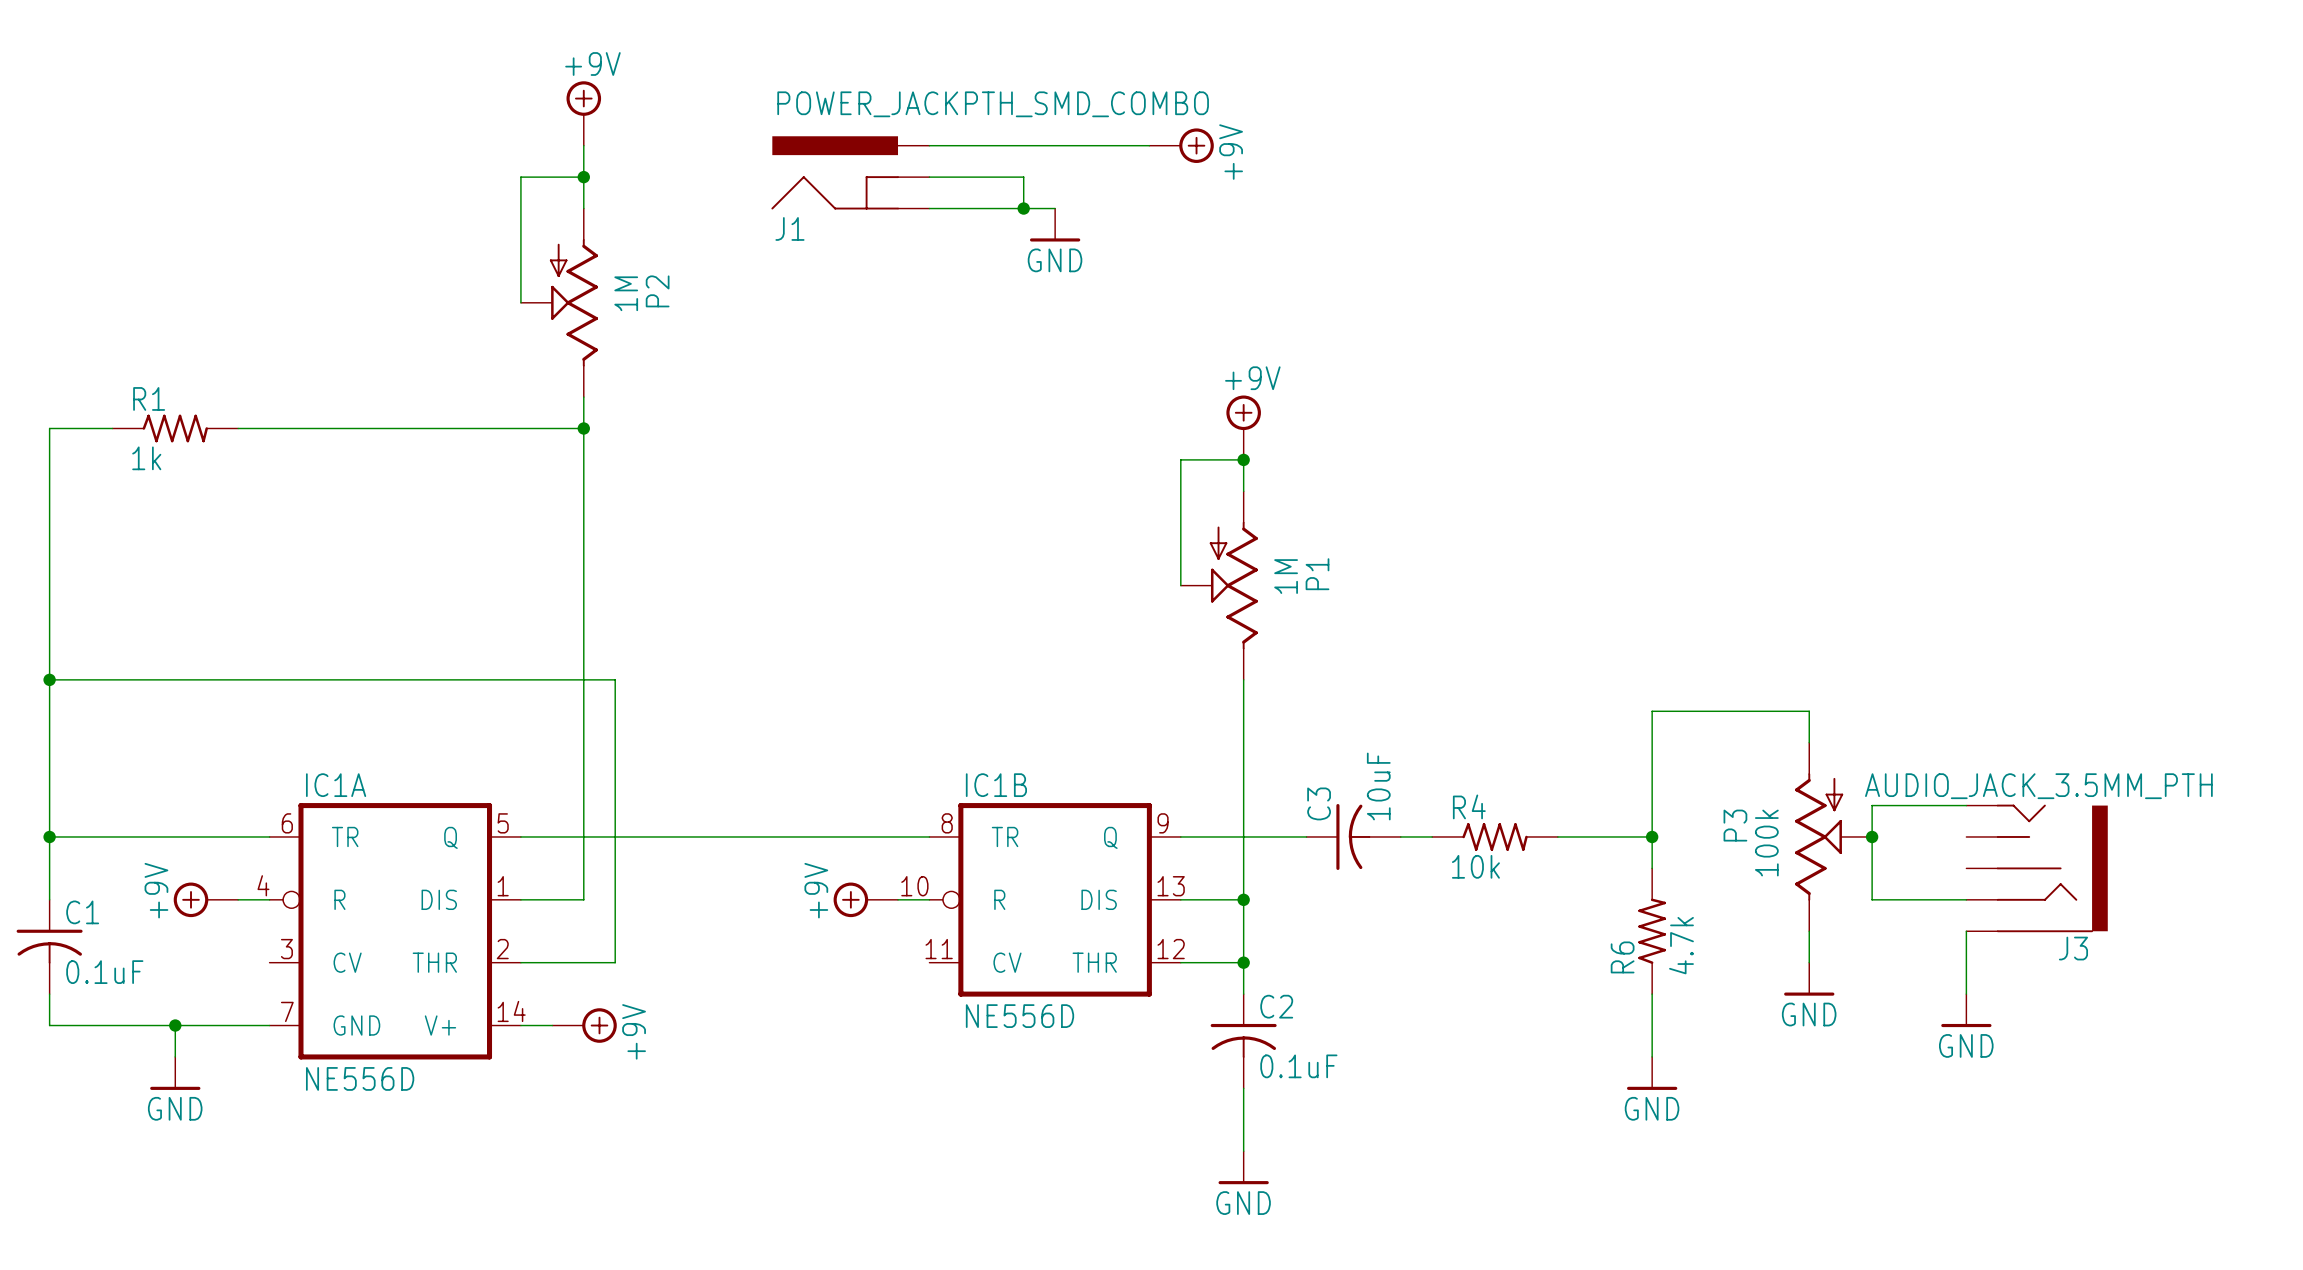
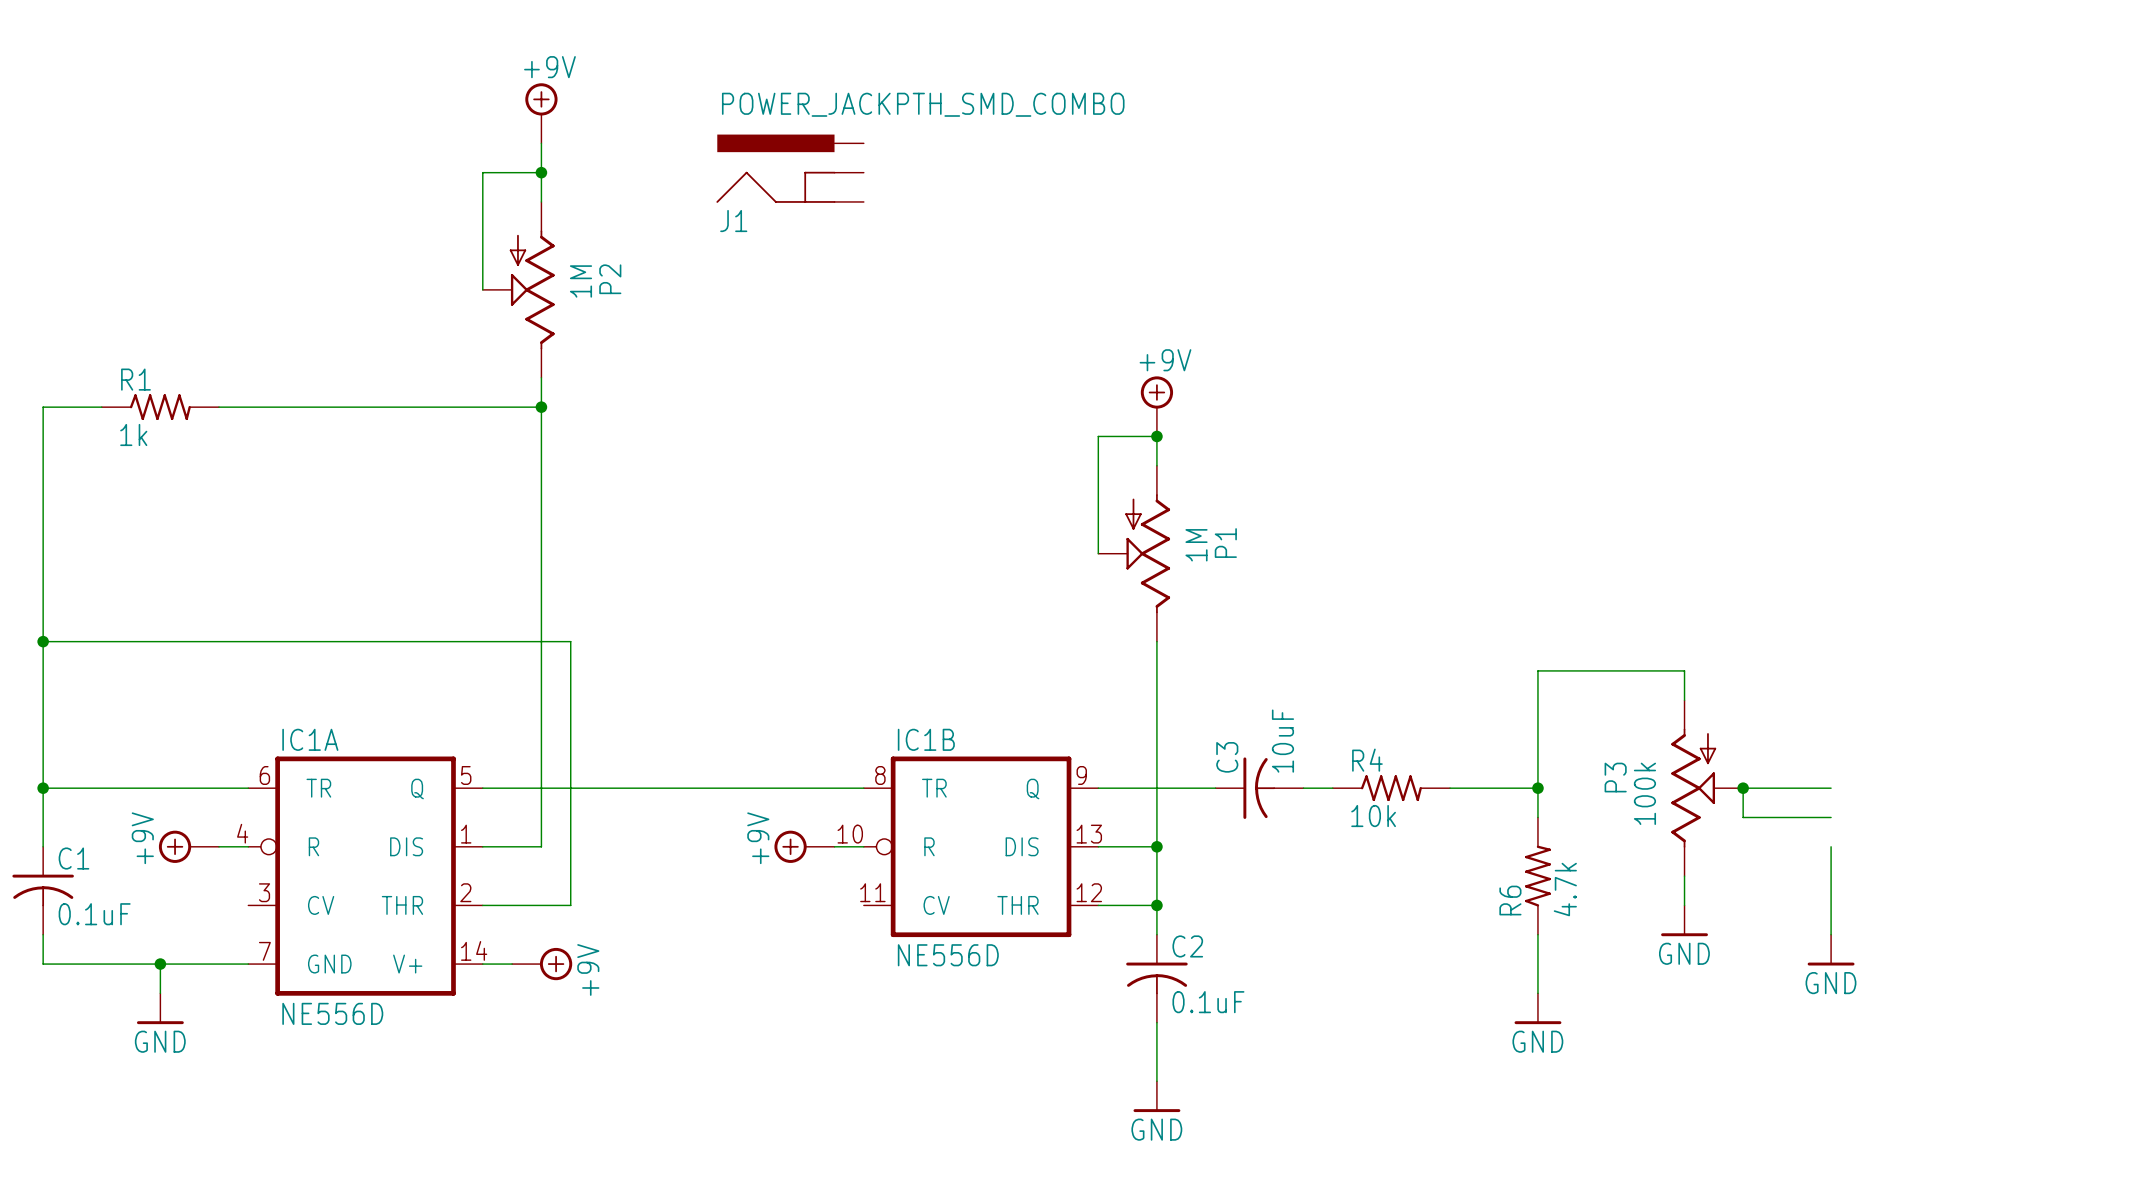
wire: (929, 145) (1149, 145) -> none
power symbol: +9V (1181, 145) -> none
wire: (929, 177) (1023, 177) (1023, 208) -> none
wire: (929, 208) (1055, 208) -> none
junction: (1023, 208) -> none
power symbol: GND (1055, 225) -> none
wire: (1966, 805) (1872, 805) (1872, 836) -> (1831, 788) (1743, 788)
wire: (1872, 868) (1872, 899) (1966, 899) -> (1743, 817) (1831, 817)
J3: AUDIO_JACK_3.5MM_PTH (2037, 868) -> none
wire: none -> (1831, 846) (1831, 876)

